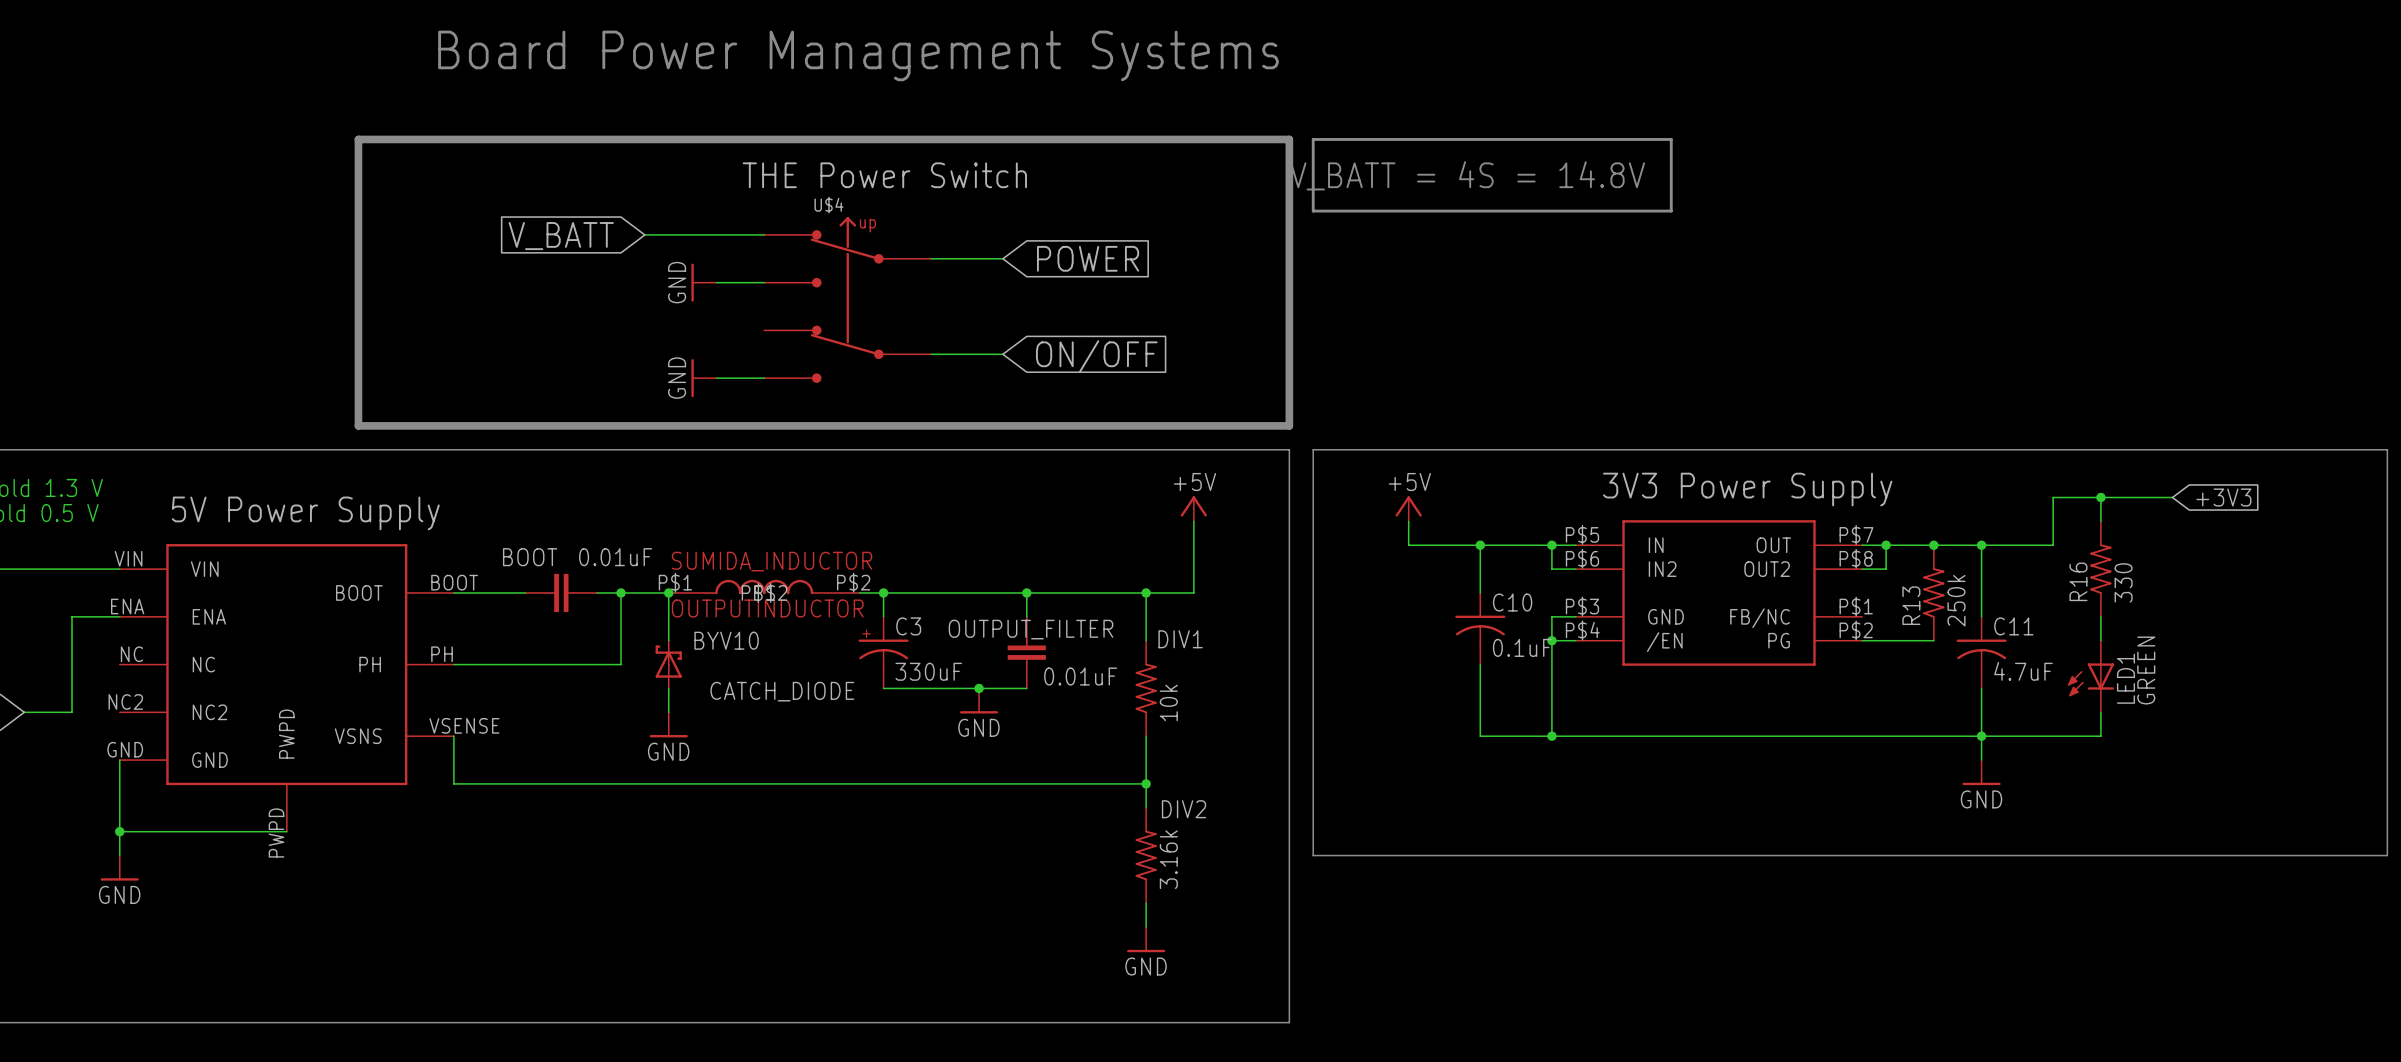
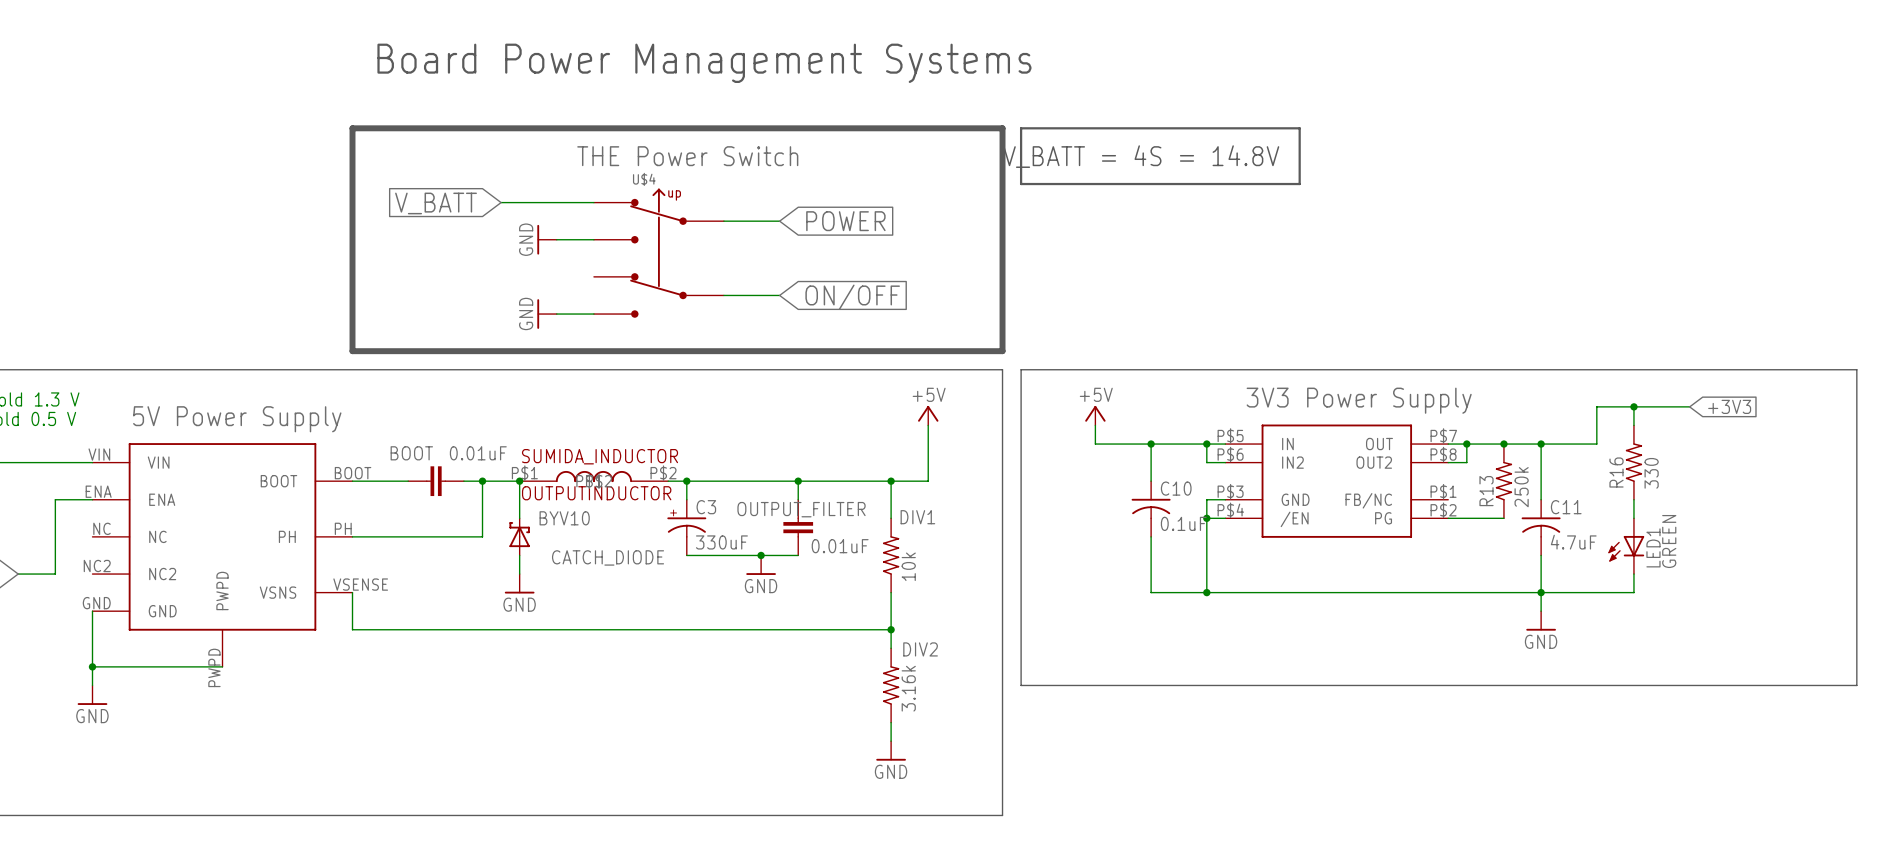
text position: Board Power Management Systems (858, 55) -> Board Power Management Systems (704, 63)
line: (453, 139) (358, 139) (358, 425) (453, 425) -> (352, 128) (352, 351)

